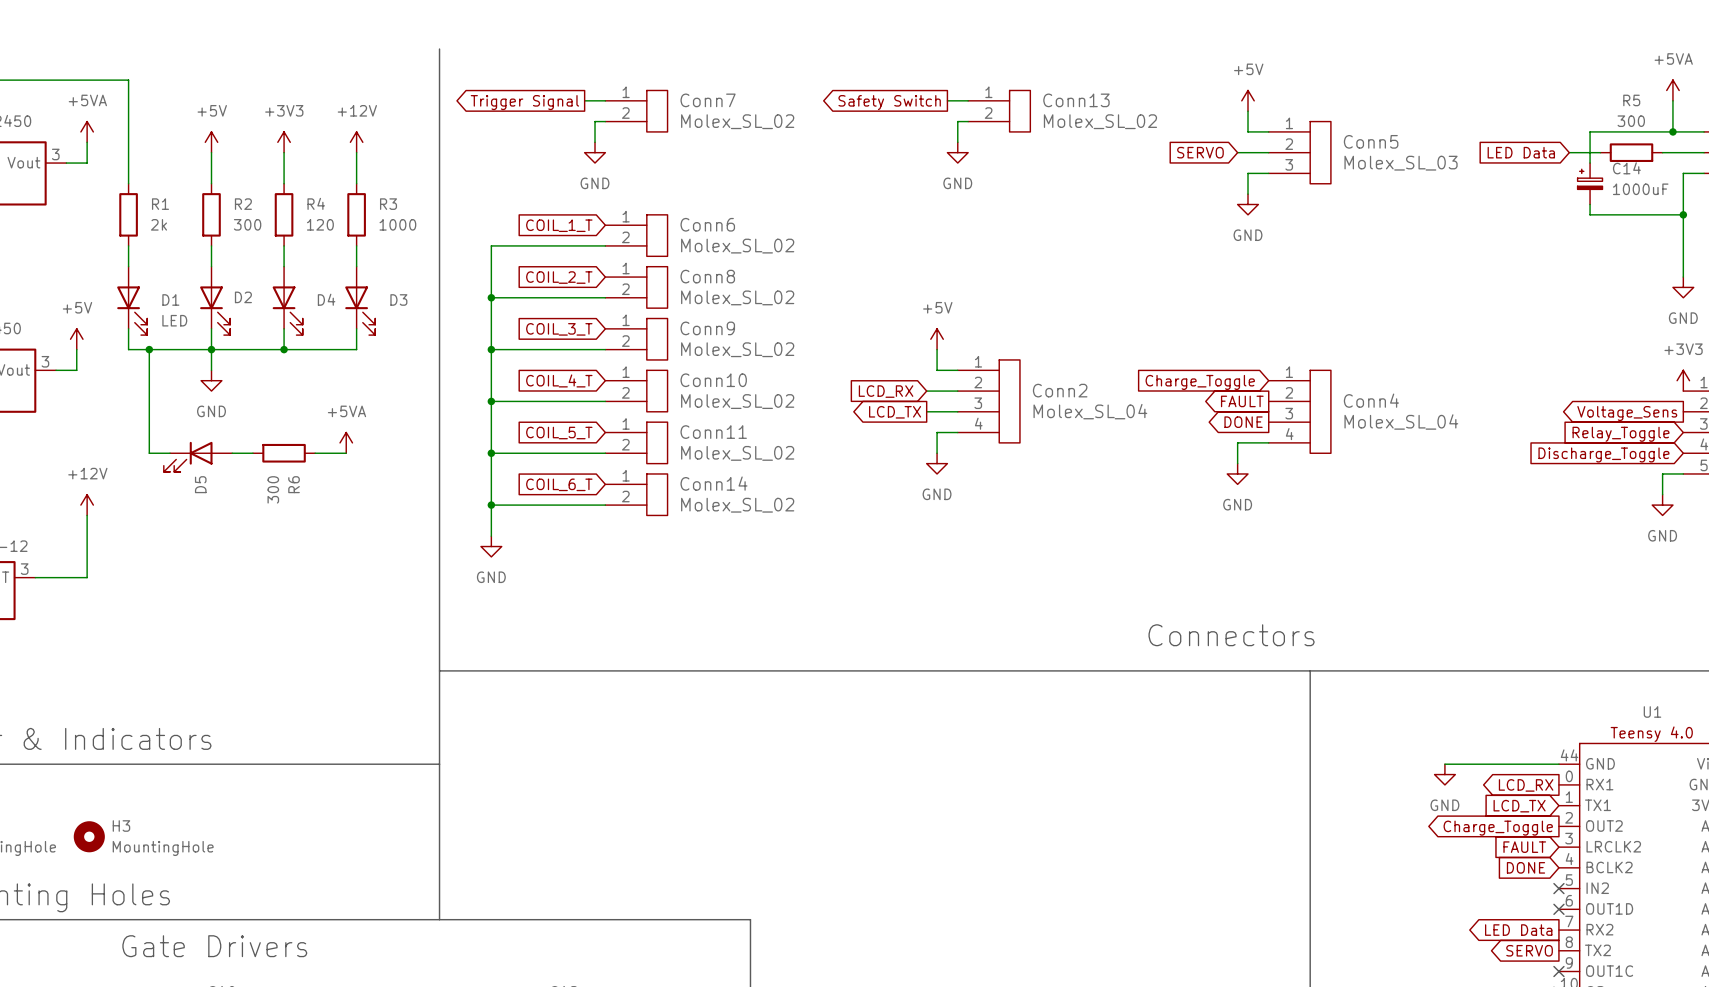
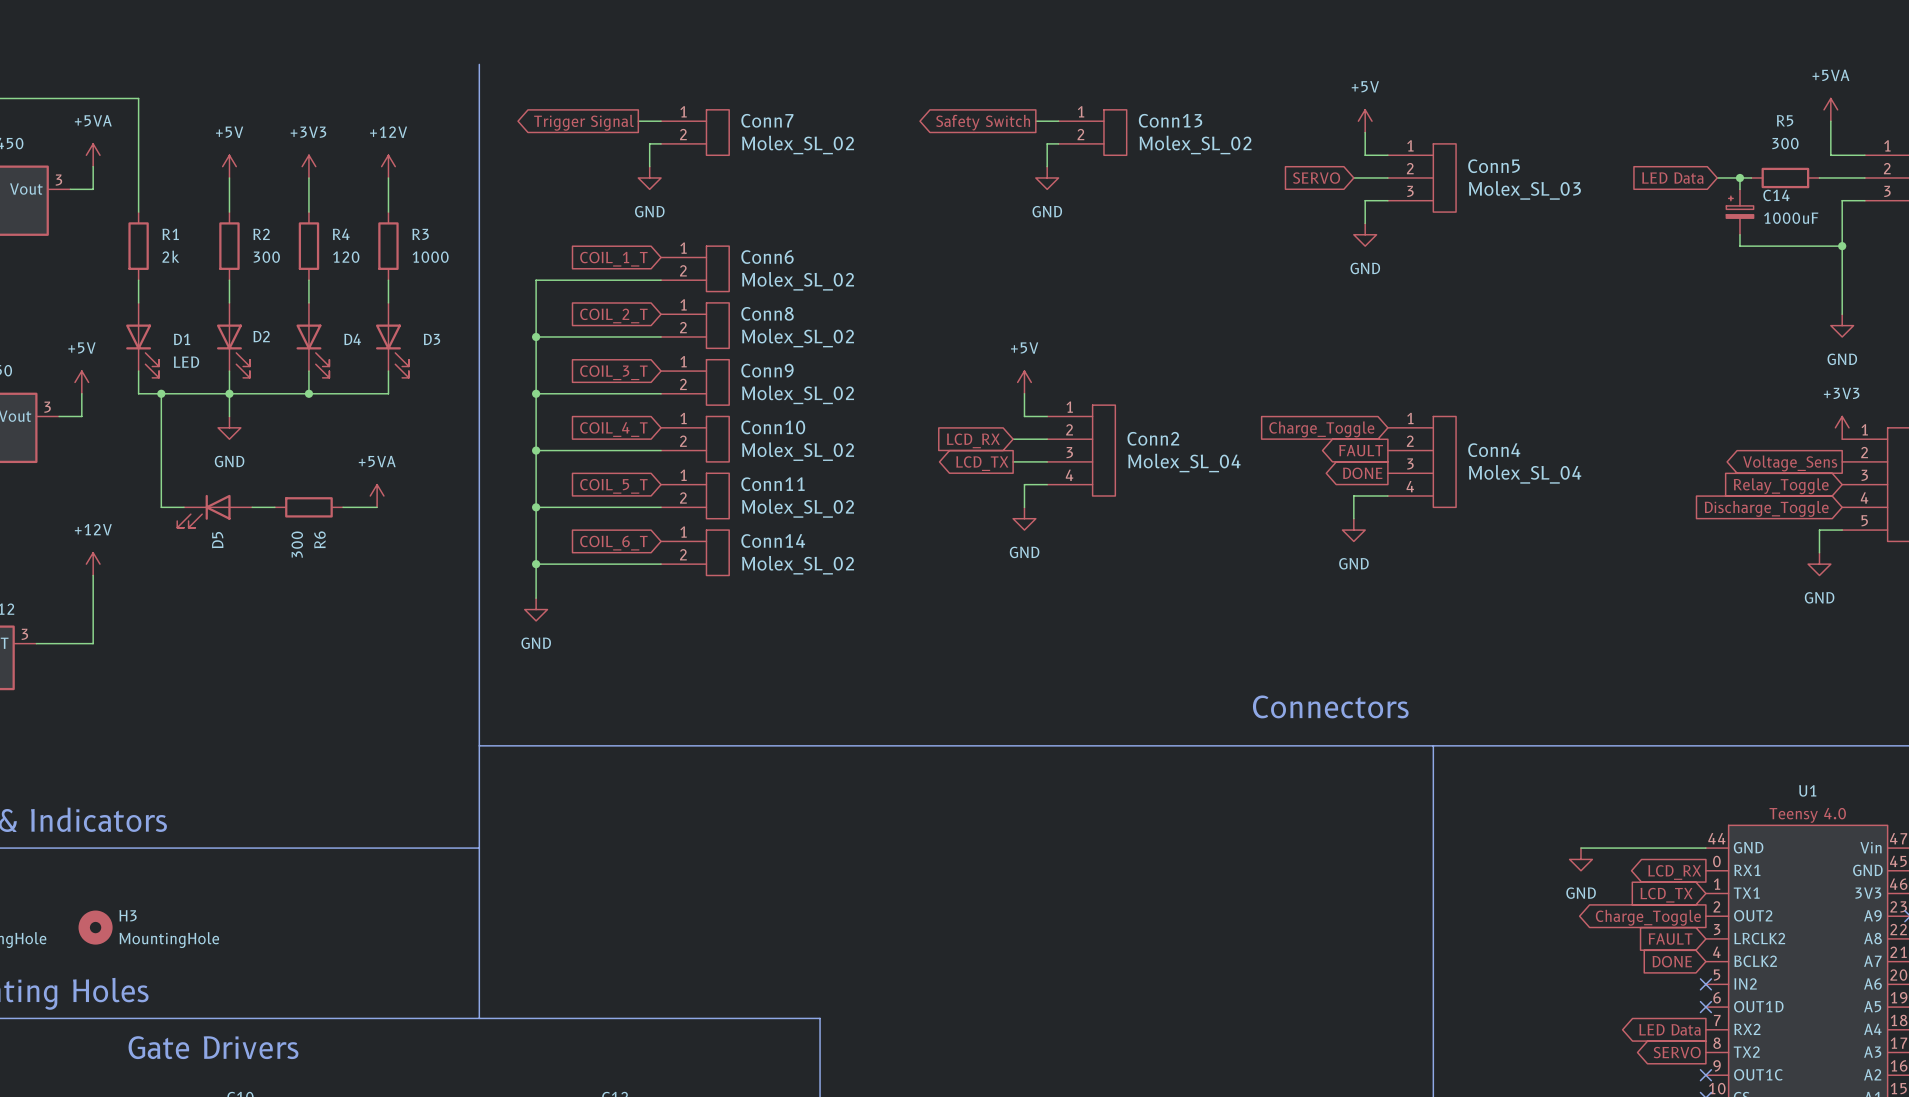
wire: (1672, 131) (1590, 131) (1590, 152) -> none
junction: (1672, 131) -> none
junction: none -> (1739, 177)

